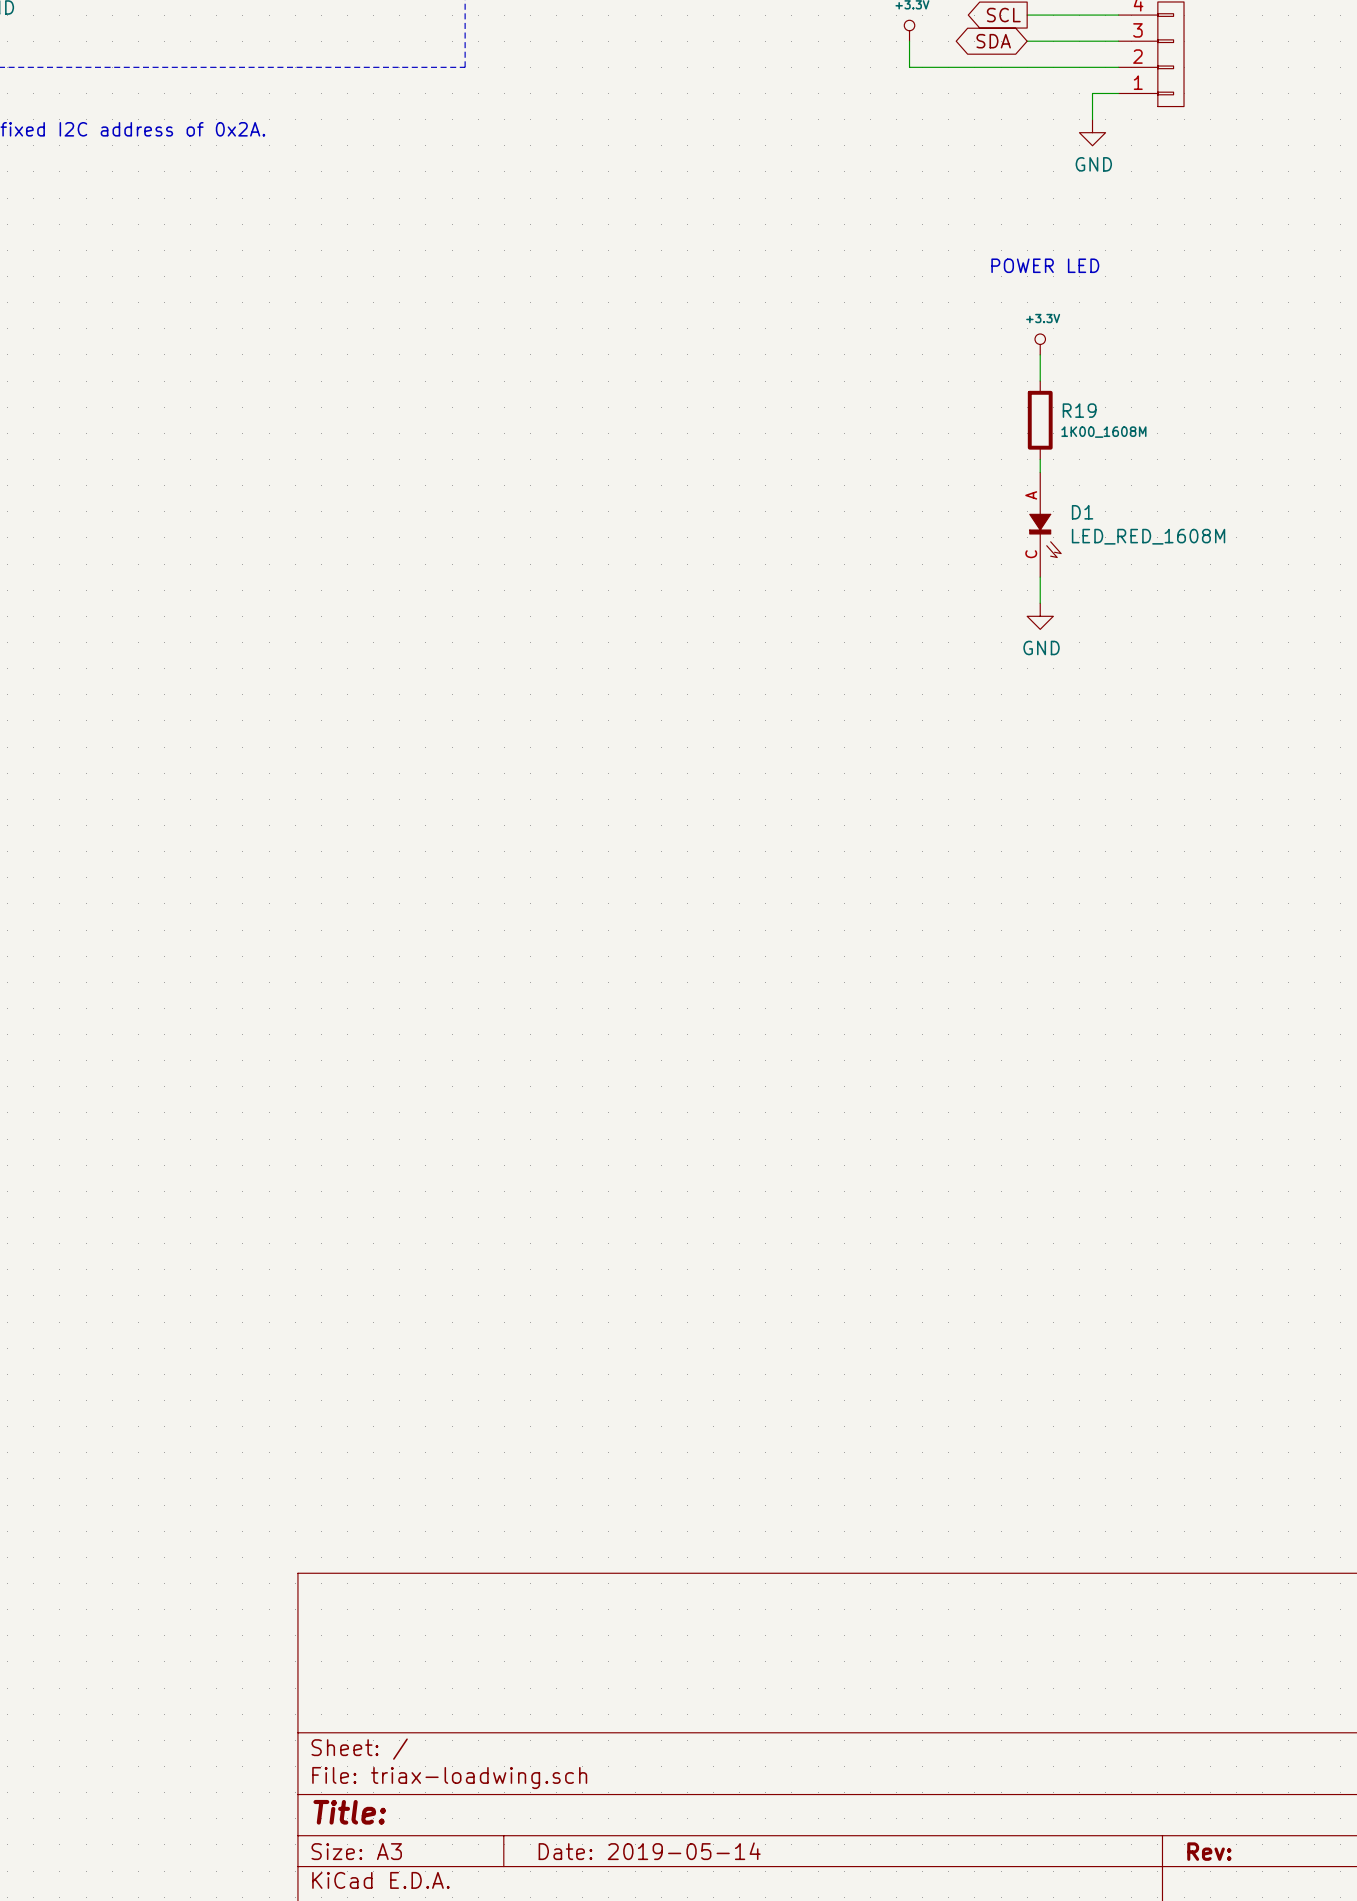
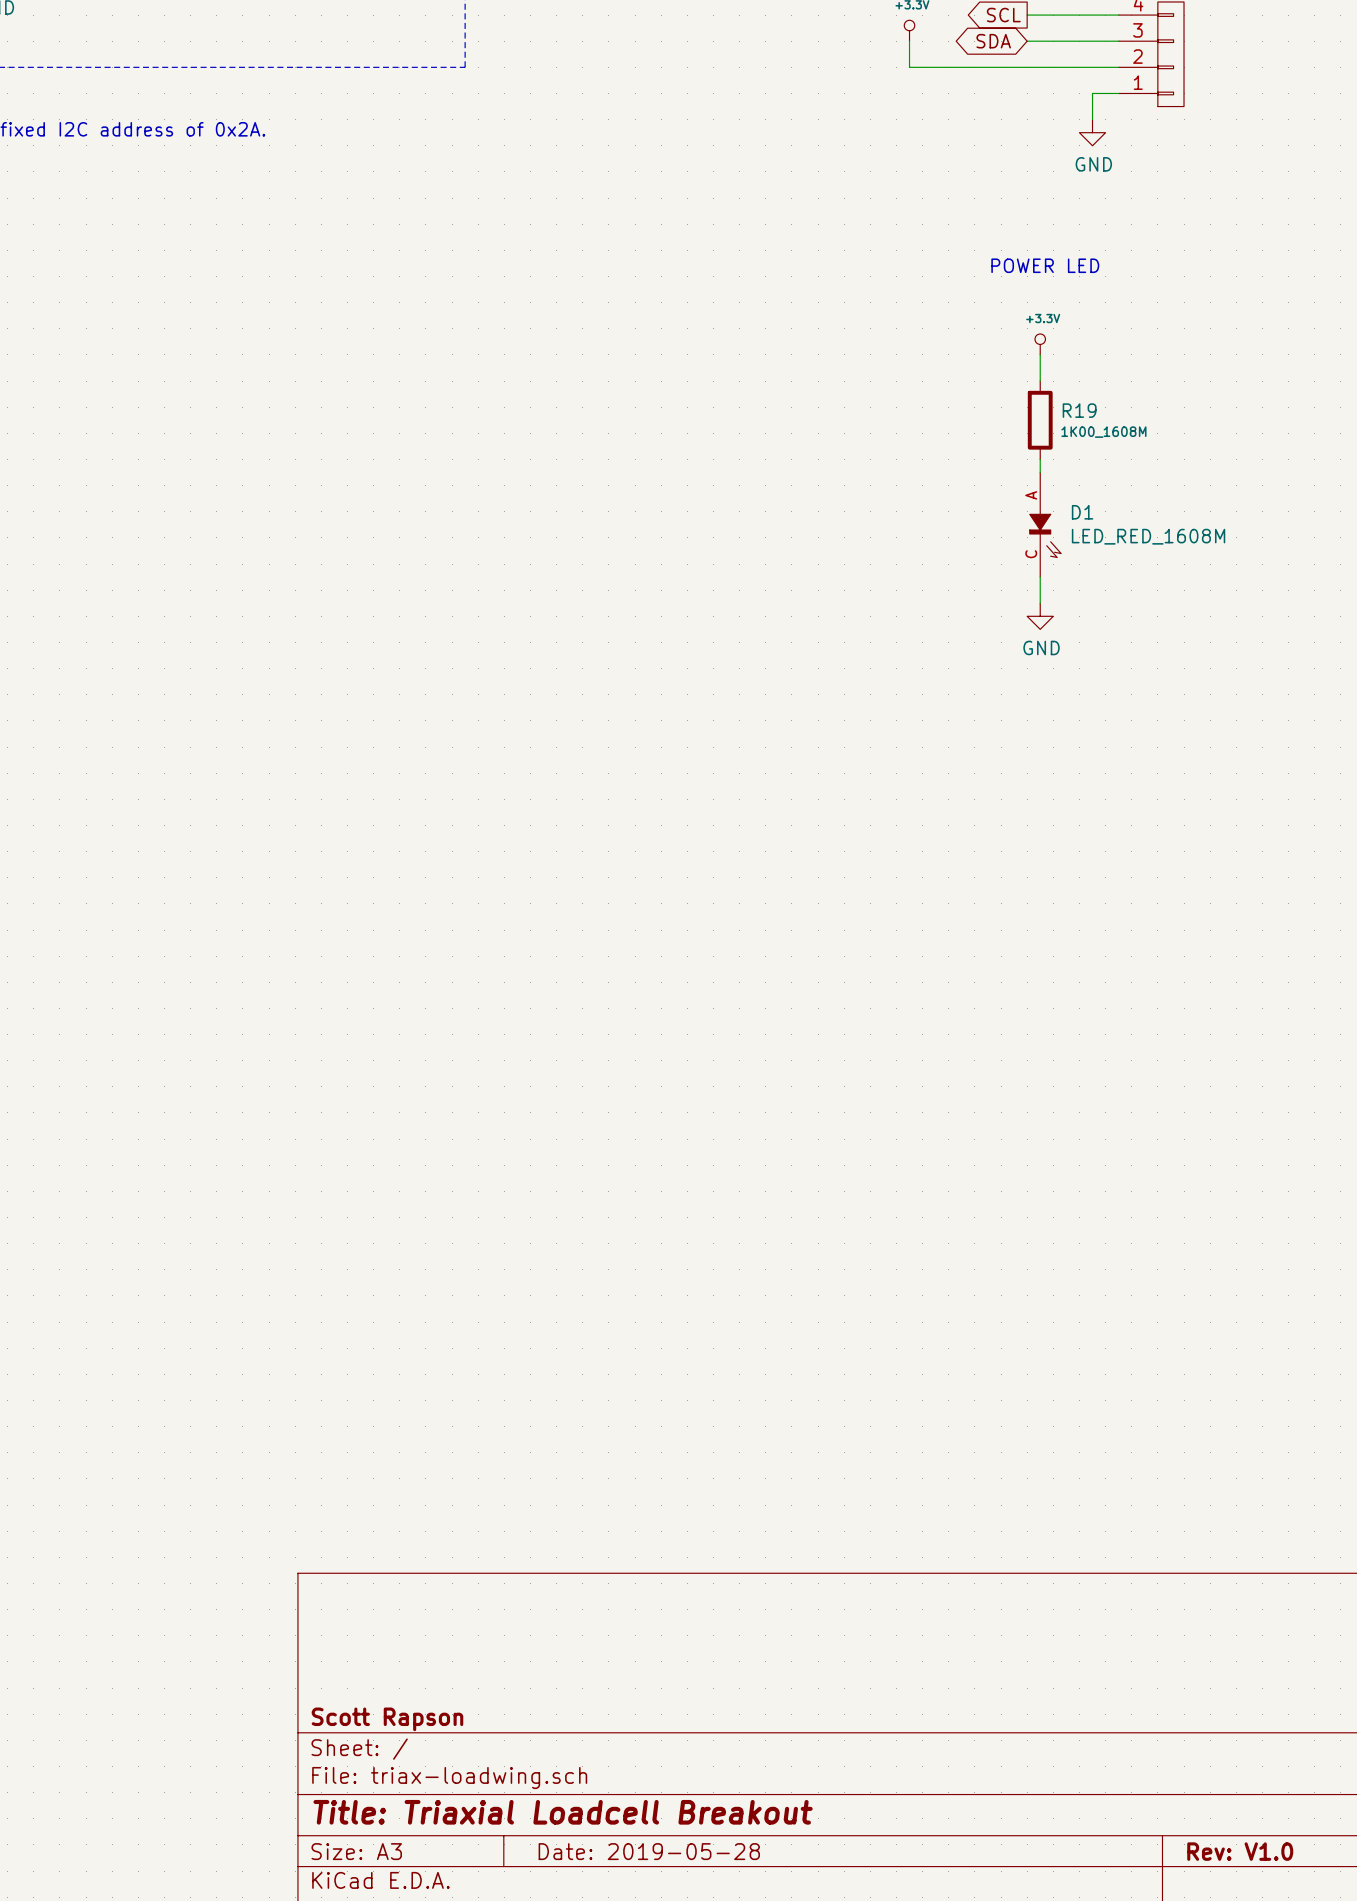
title block: none -> Scott Rapson (387, 1719)
title block: Title: (349, 1812) -> Title: Triaxial Loadcell Breakout (563, 1812)
title block: Date: 2019-05-14 (649, 1851) -> Date: 2019-05-28 (649, 1851)
title block: Rev: (1209, 1851) -> Rev: V1.0 (1240, 1851)

